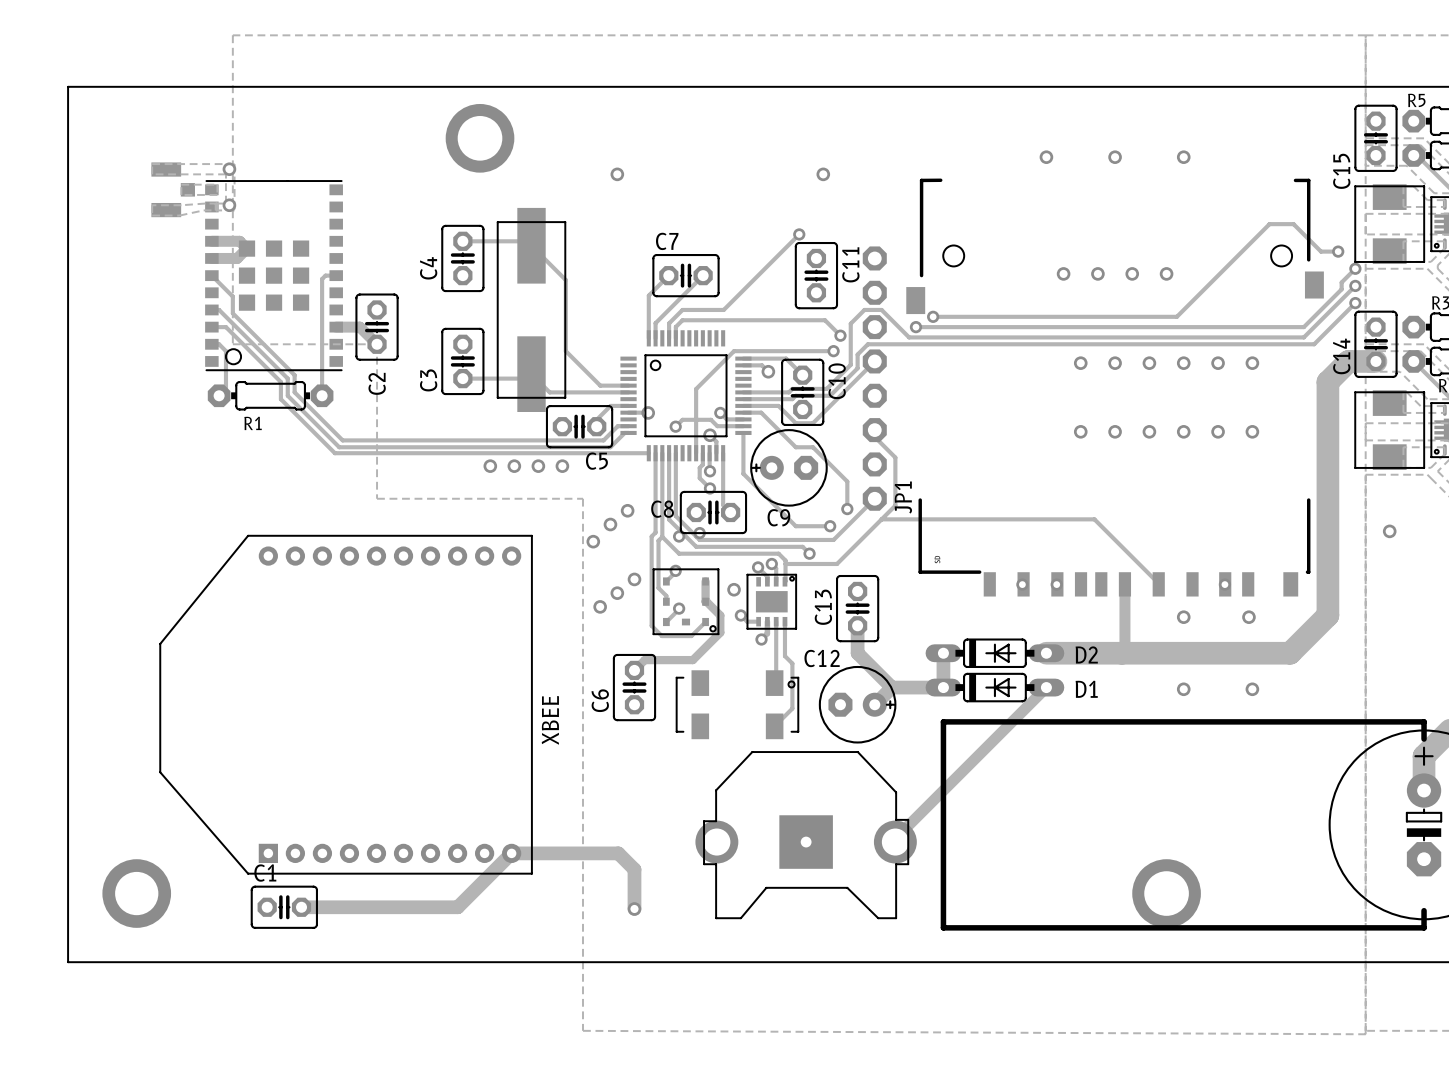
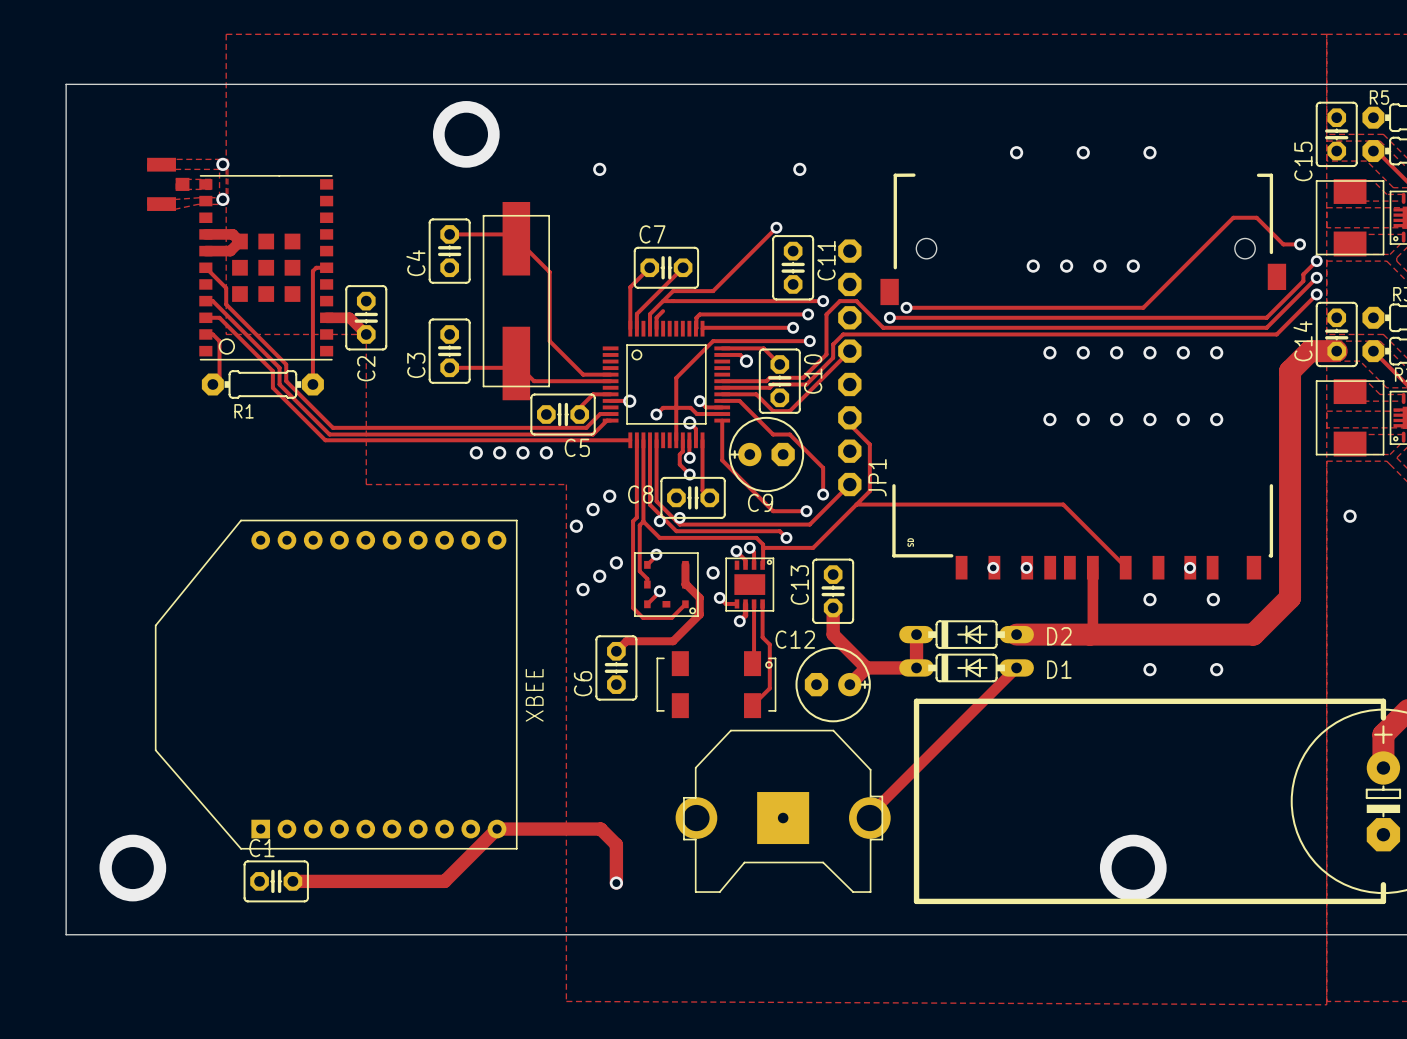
track: (734, 299) (723, 309) -> (713, 291) (673, 291) (663, 301)
track: none -> (703, 301) (823, 301)
via: none -> (823, 301)
track: (682, 320) (825, 320) (840, 335) -> none
track: none -> (808, 314) (699, 314) (696, 317) (695, 328)
via: none -> (808, 314)
via: (840, 335) -> none
track: none -> (793, 327) (702, 328)
via: none -> (793, 327)

